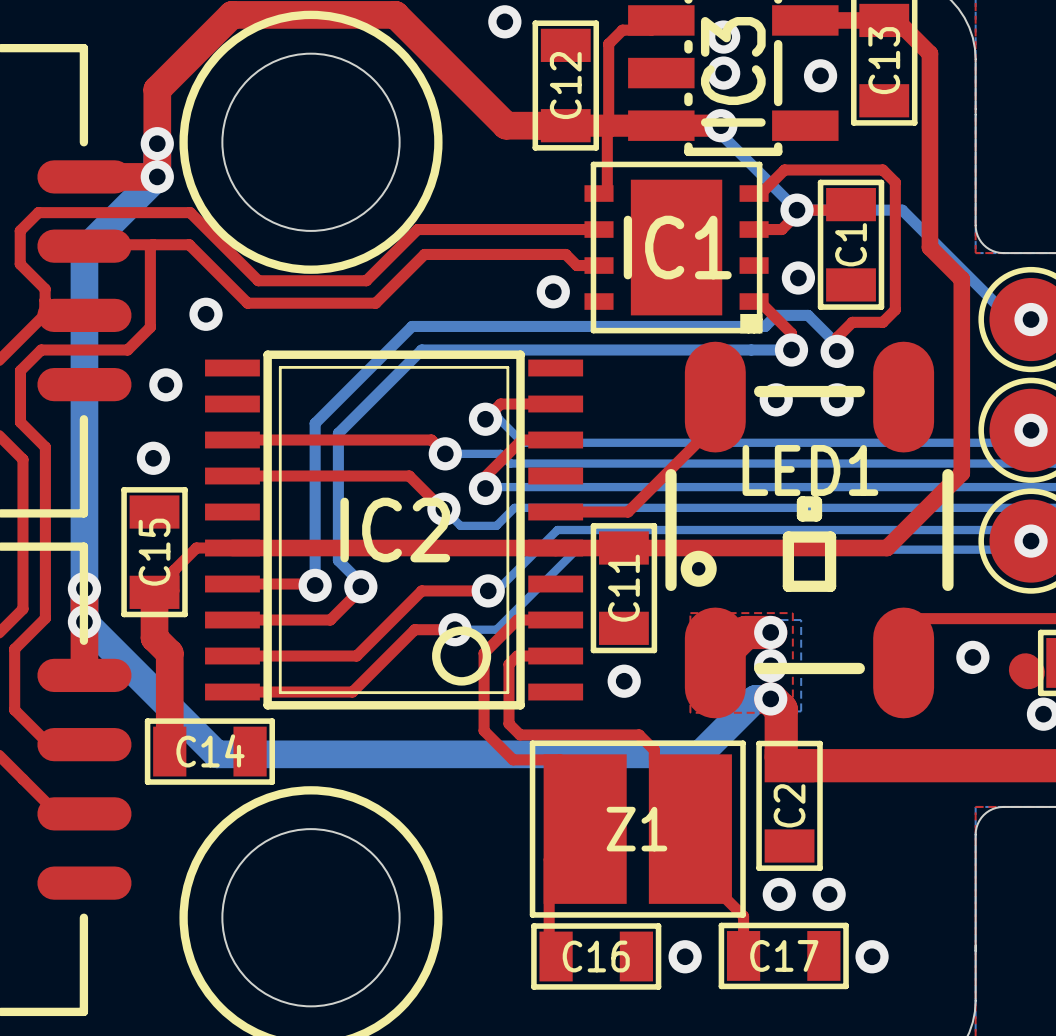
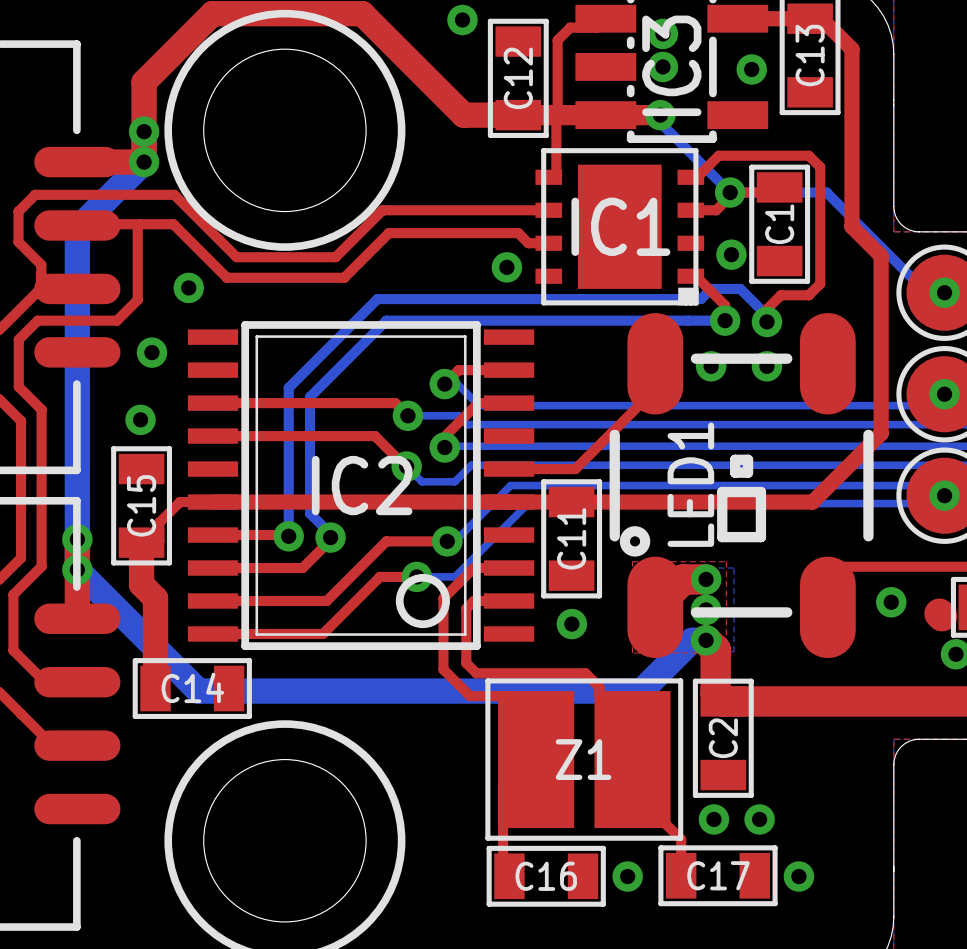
LED1 footprint: [665, 341, 954, 719] -> [609, 313, 874, 659]
LED1 name rotation: 0° (810, 470) -> 90° counterclockwise (690, 484)

